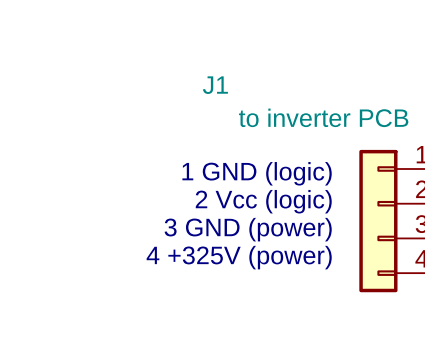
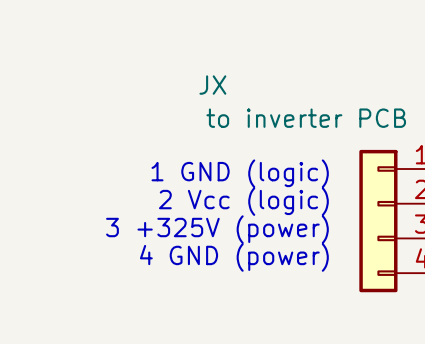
J1 name: J1 (215, 85) -> JX (212, 85)
text: 3 GND (power) (248, 229) -> 3 +325V (power) (217, 229)
text: 4 +325V (power) (239, 257) -> 4 GND (power) (234, 257)

